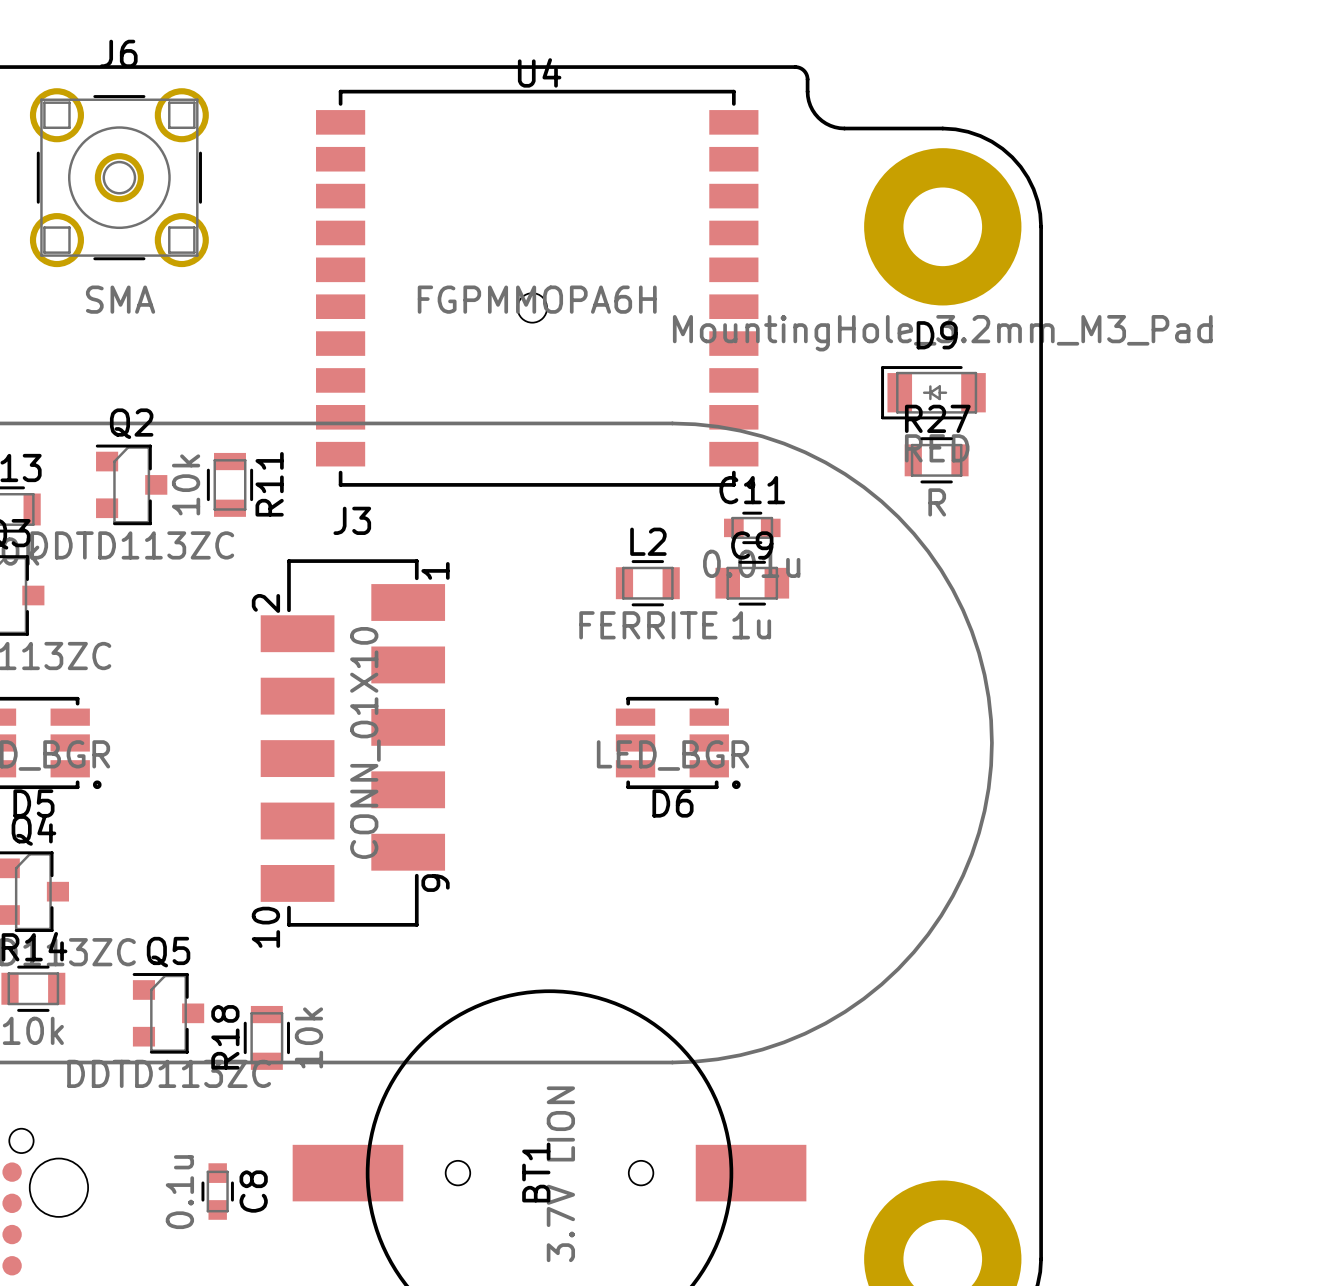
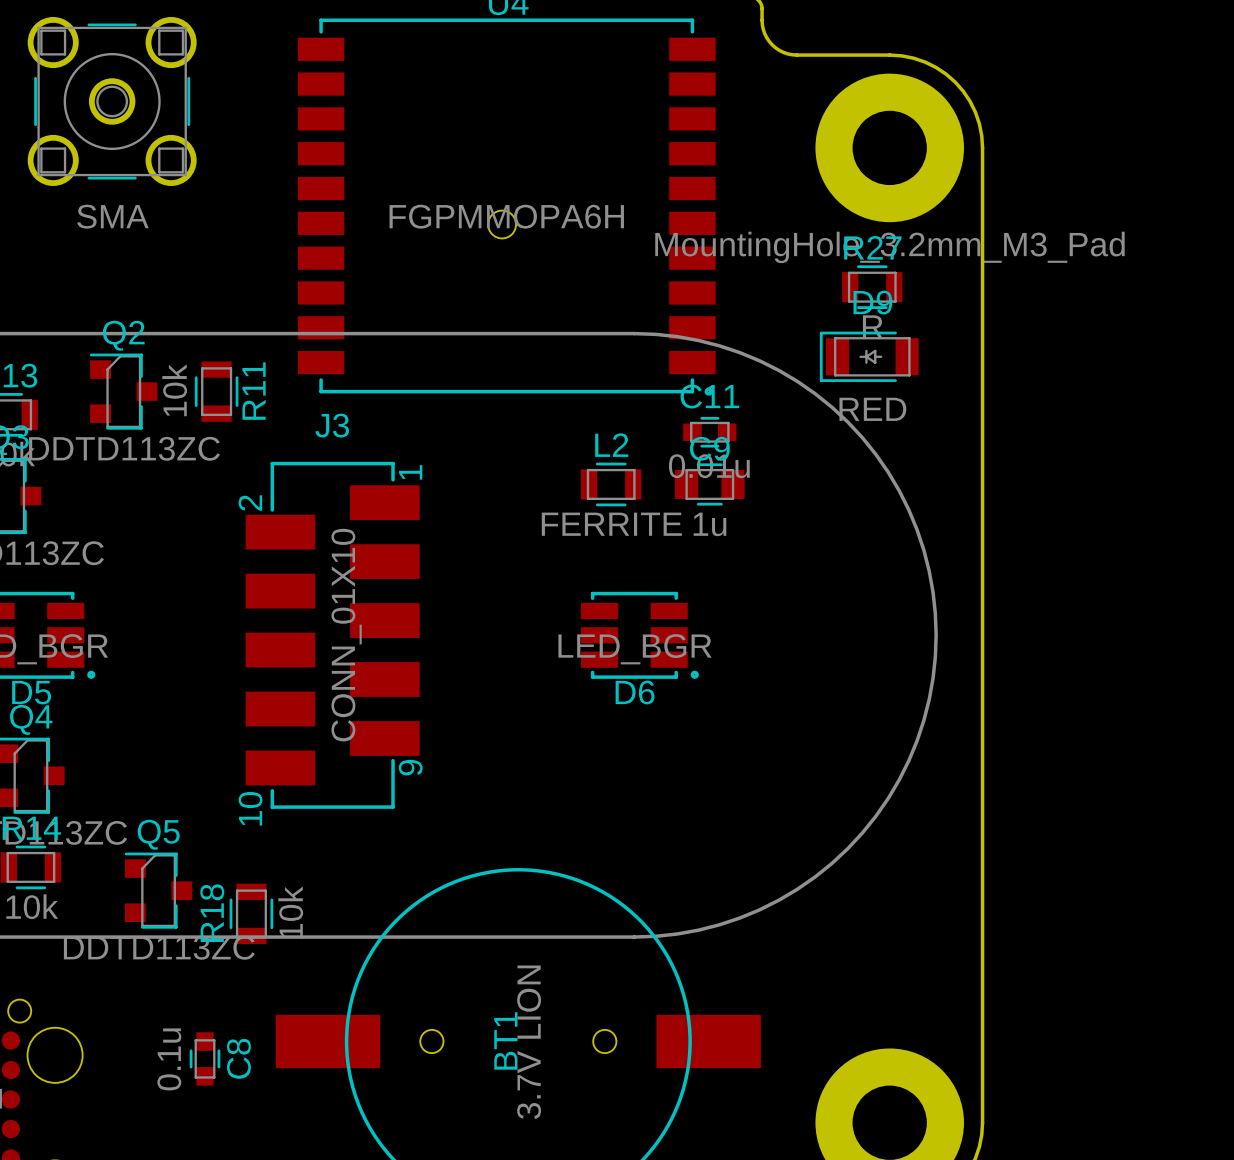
D9 position: (933, 392) -> (869, 356)
R27 position: (936, 460) -> (872, 287)

